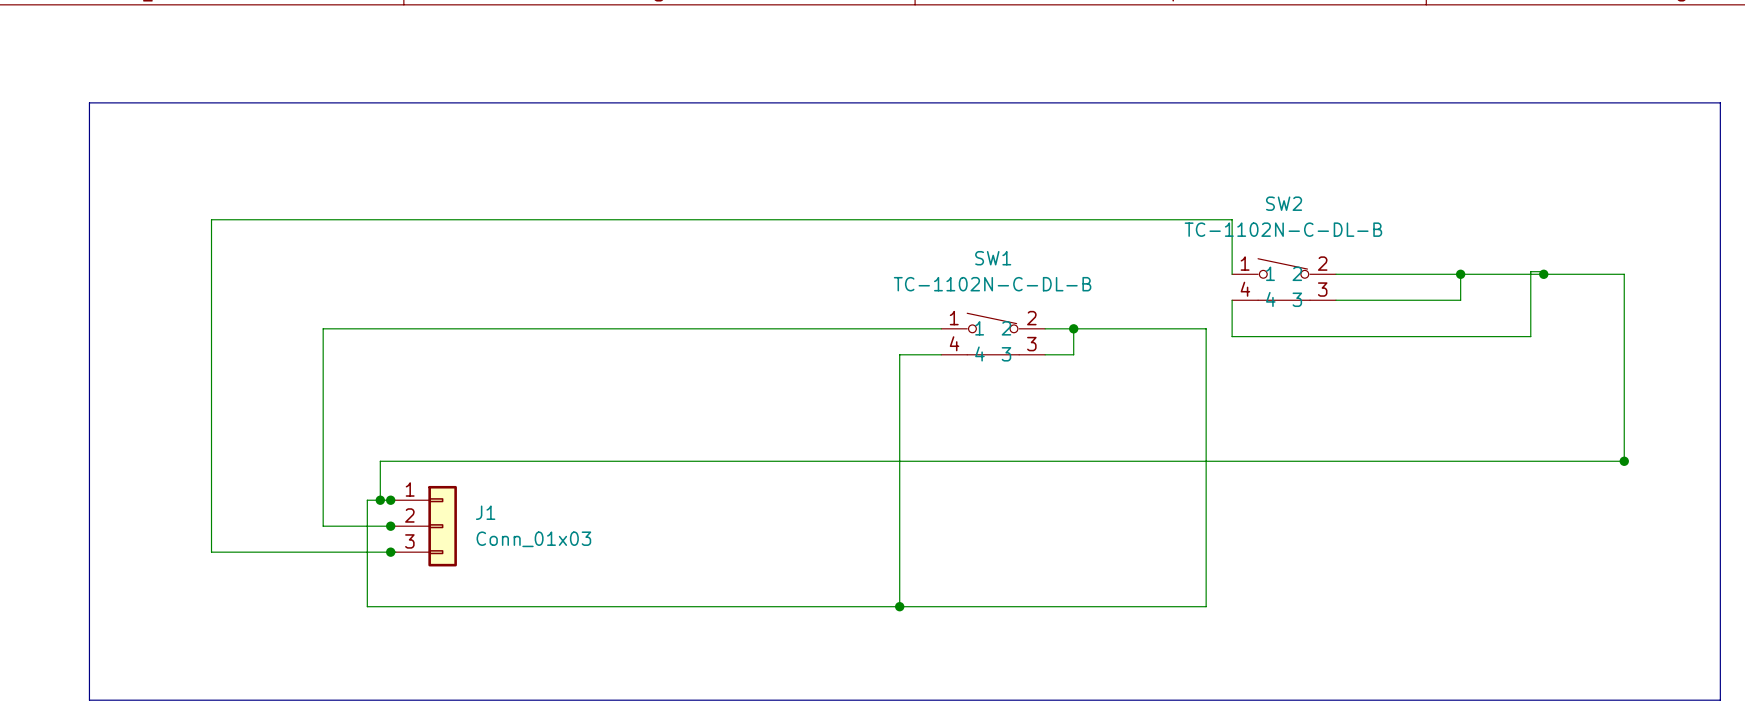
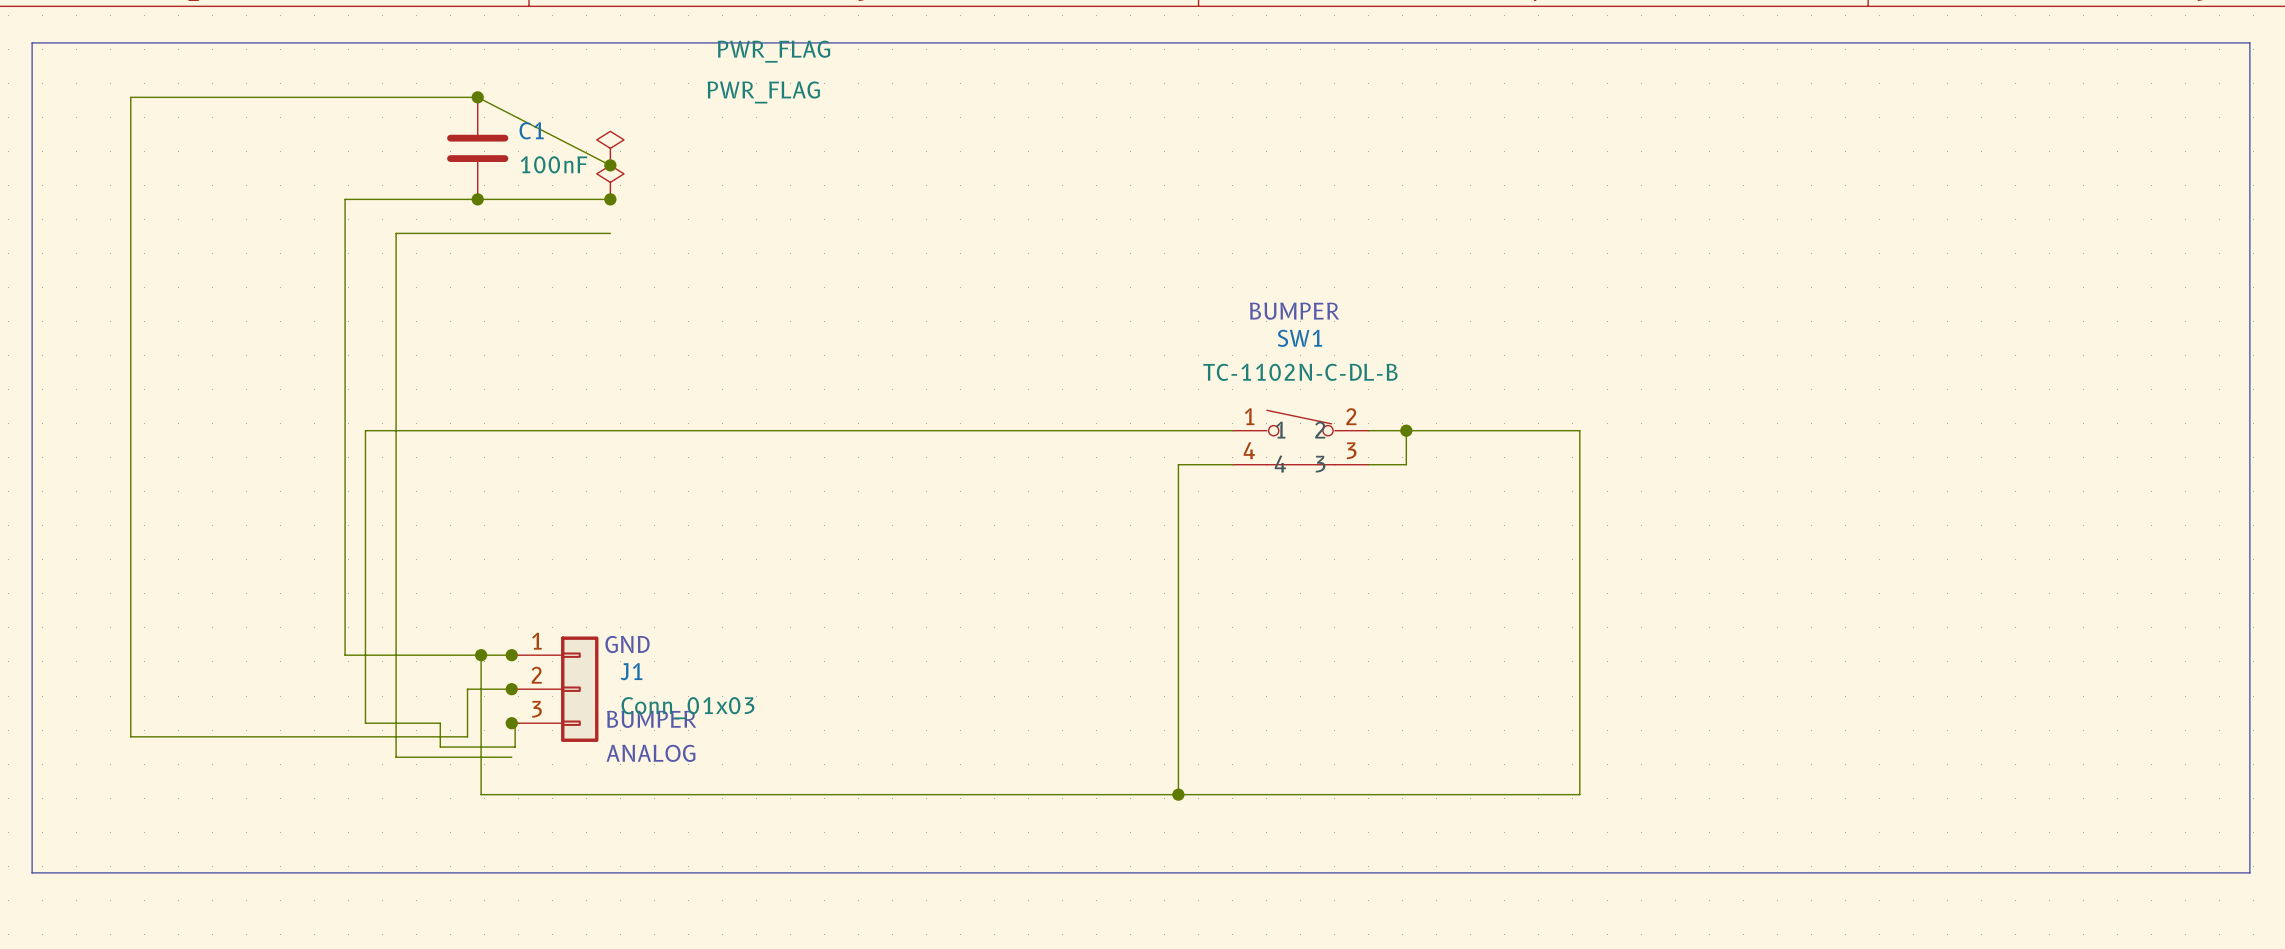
junction: none -> (477, 97)
line: (89, 102) (1720, 102) (1720, 700) (89, 700) (89, 102) -> (32, 42) (32, 872) (2249, 872) (2249, 42) (32, 42)
C1: none -> 100nF (477, 148)
power symbol: none -> PWR_FLAG (610, 148)
wire: none -> (610, 165) (477, 97) (130, 97) (130, 736) (467, 736) (467, 689)
junction: none -> (610, 165)
power symbol: none -> PWR_FLAG (610, 182)
junction: none -> (477, 199)
wire: none -> (610, 199) (345, 199) (345, 655) (481, 655)
junction: none -> (610, 199)
wire: none -> (610, 233) (396, 233) (396, 757) (511, 757)
text: none -> BUMPER (1294, 311)
wire: (1232, 274) (1232, 219) (211, 219) (211, 552) (279, 552) -> none
wire: (1335, 274) (1624, 274) (1624, 461) -> none
wire: (1460, 274) (1460, 300) (1335, 300) -> none
junction: (1460, 274) -> none
wire: (1543, 274) (1543, 271) (1530, 271) (1530, 336) (1232, 336) (1232, 300) -> none
junction: (1543, 274) -> none
SW2: TC-1102N-C-DL-B (1284, 279) -> none
wire: (323, 328) (323, 526) (356, 526) -> (423, 430) (365, 430) (365, 723)
junction: (1624, 461) -> none
wire: (1626, 461) (380, 461) (380, 500) -> none
text: none -> GND (627, 644)
junction position: (380, 500) -> (481, 655)
text: none -> BUMPER (651, 719)
wire: (336, 552) (390, 552) -> (440, 723) (440, 747) (515, 747) (515, 723)
text: none -> ANALOG (650, 753)

